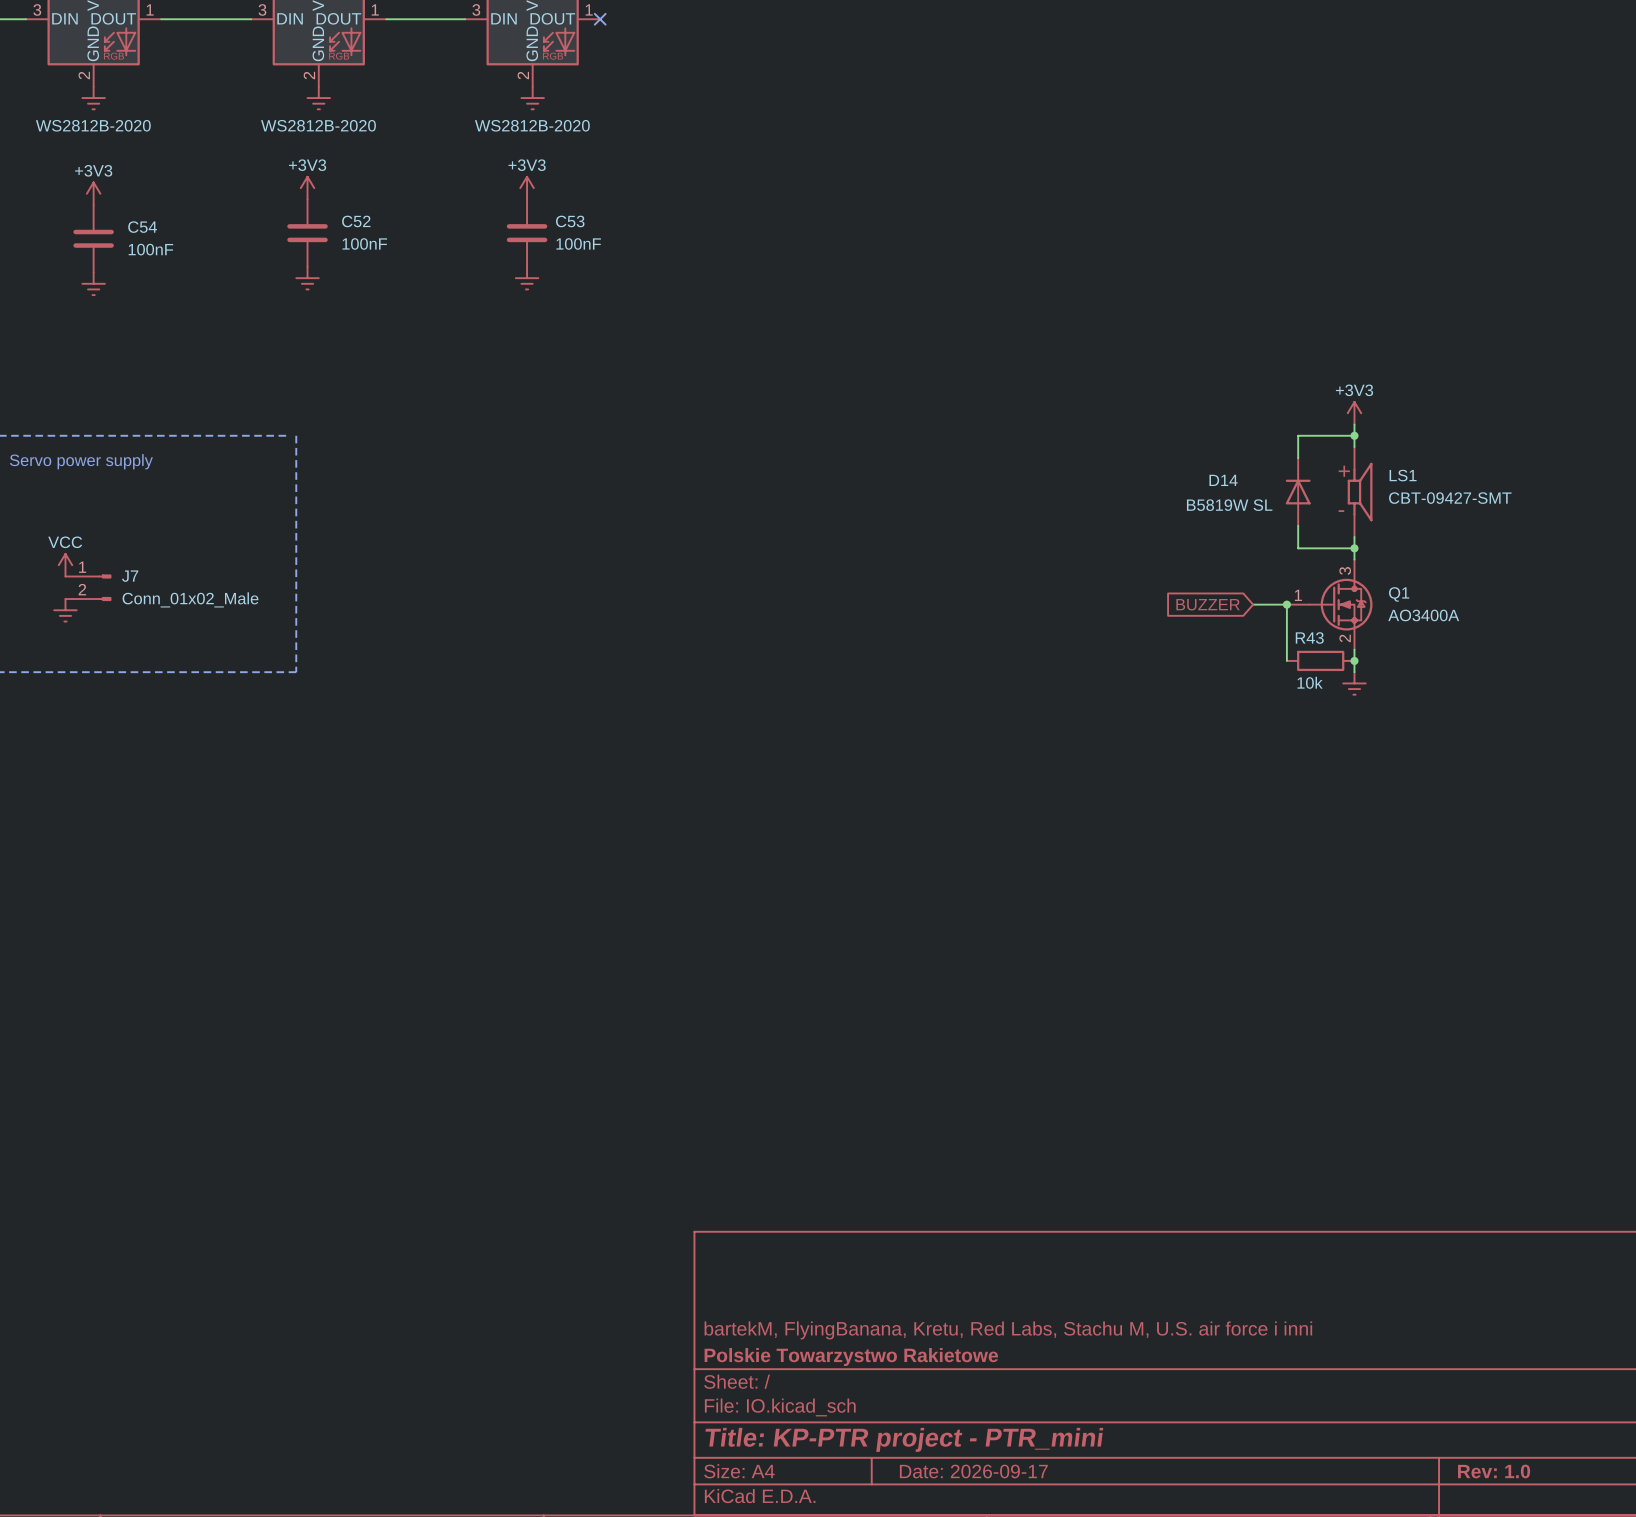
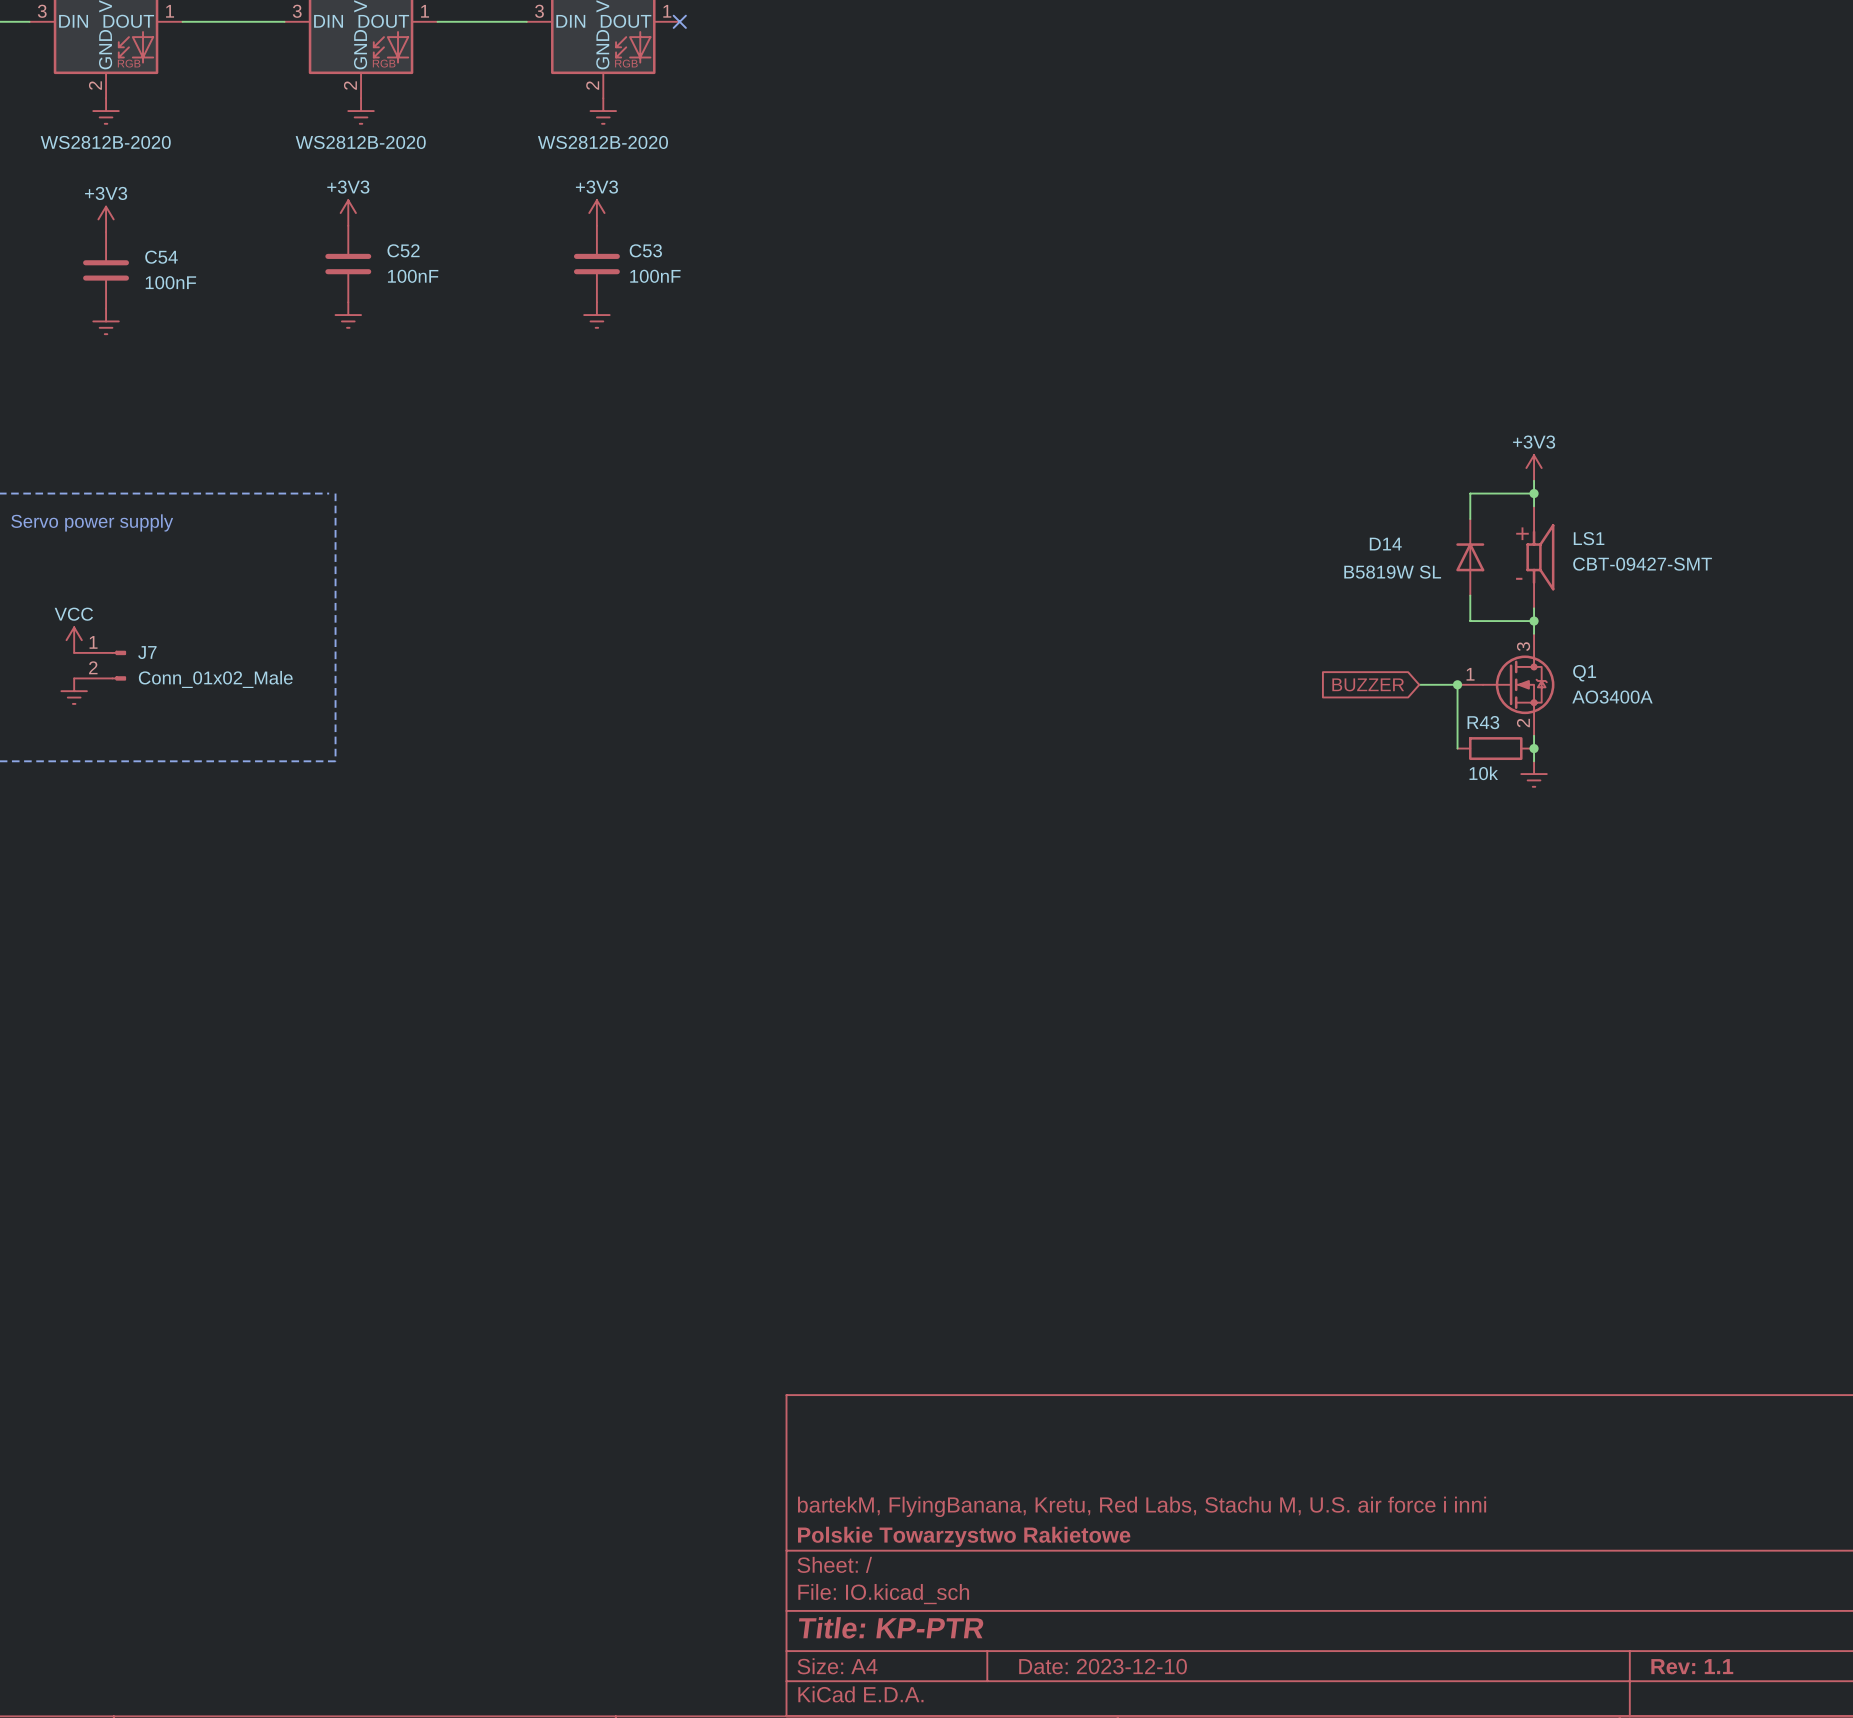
title block: Title: KP-PTR project - PTR_mini (904, 1439) -> Title: KP-PTR (891, 1627)
title block: Date: 2026-09-17 (973, 1471) -> Date: 2023-12-10 (1103, 1666)
title block: Rev: 1.0 (1494, 1471) -> Rev: 1.1 (1692, 1666)

